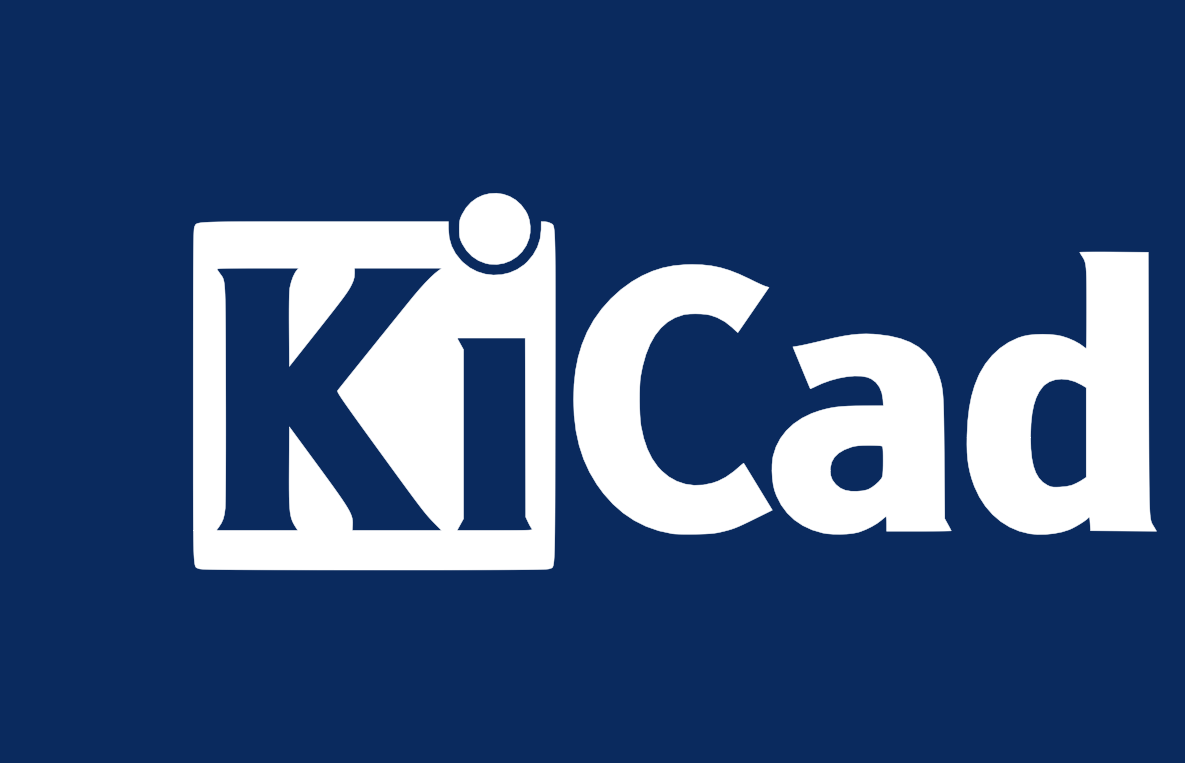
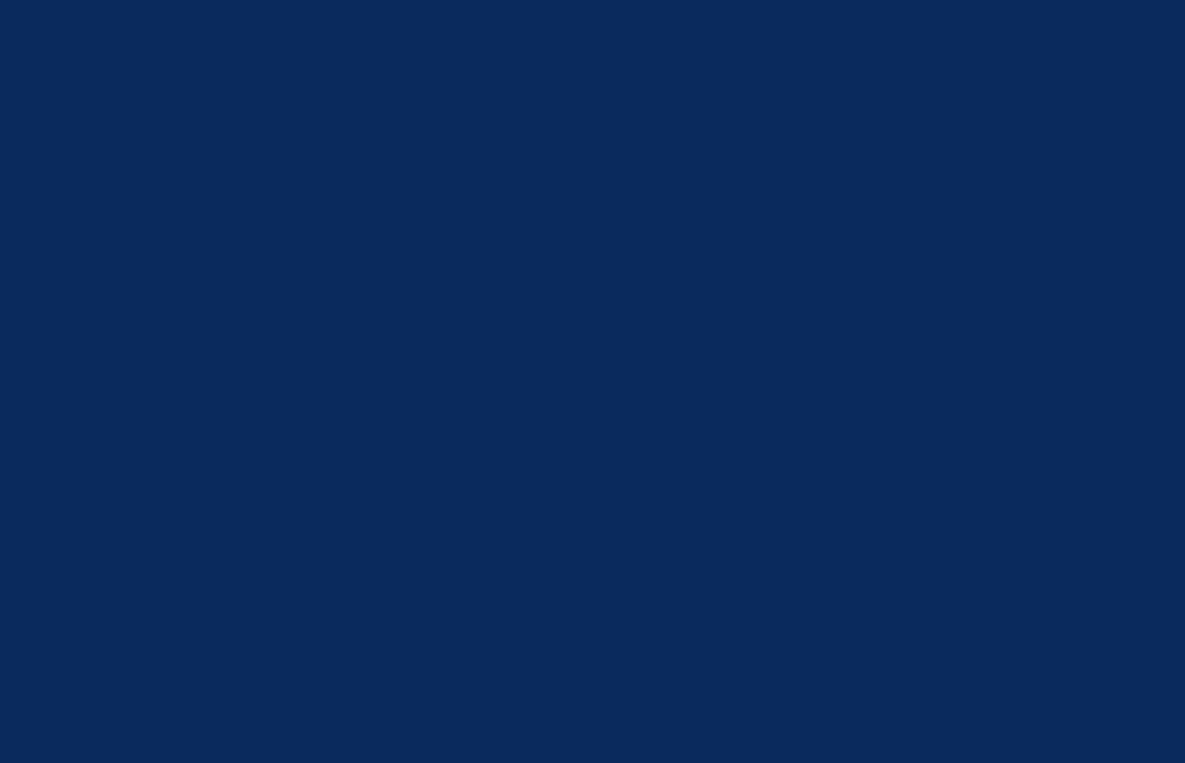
drawing: [192, 192, 1157, 571] -> none

